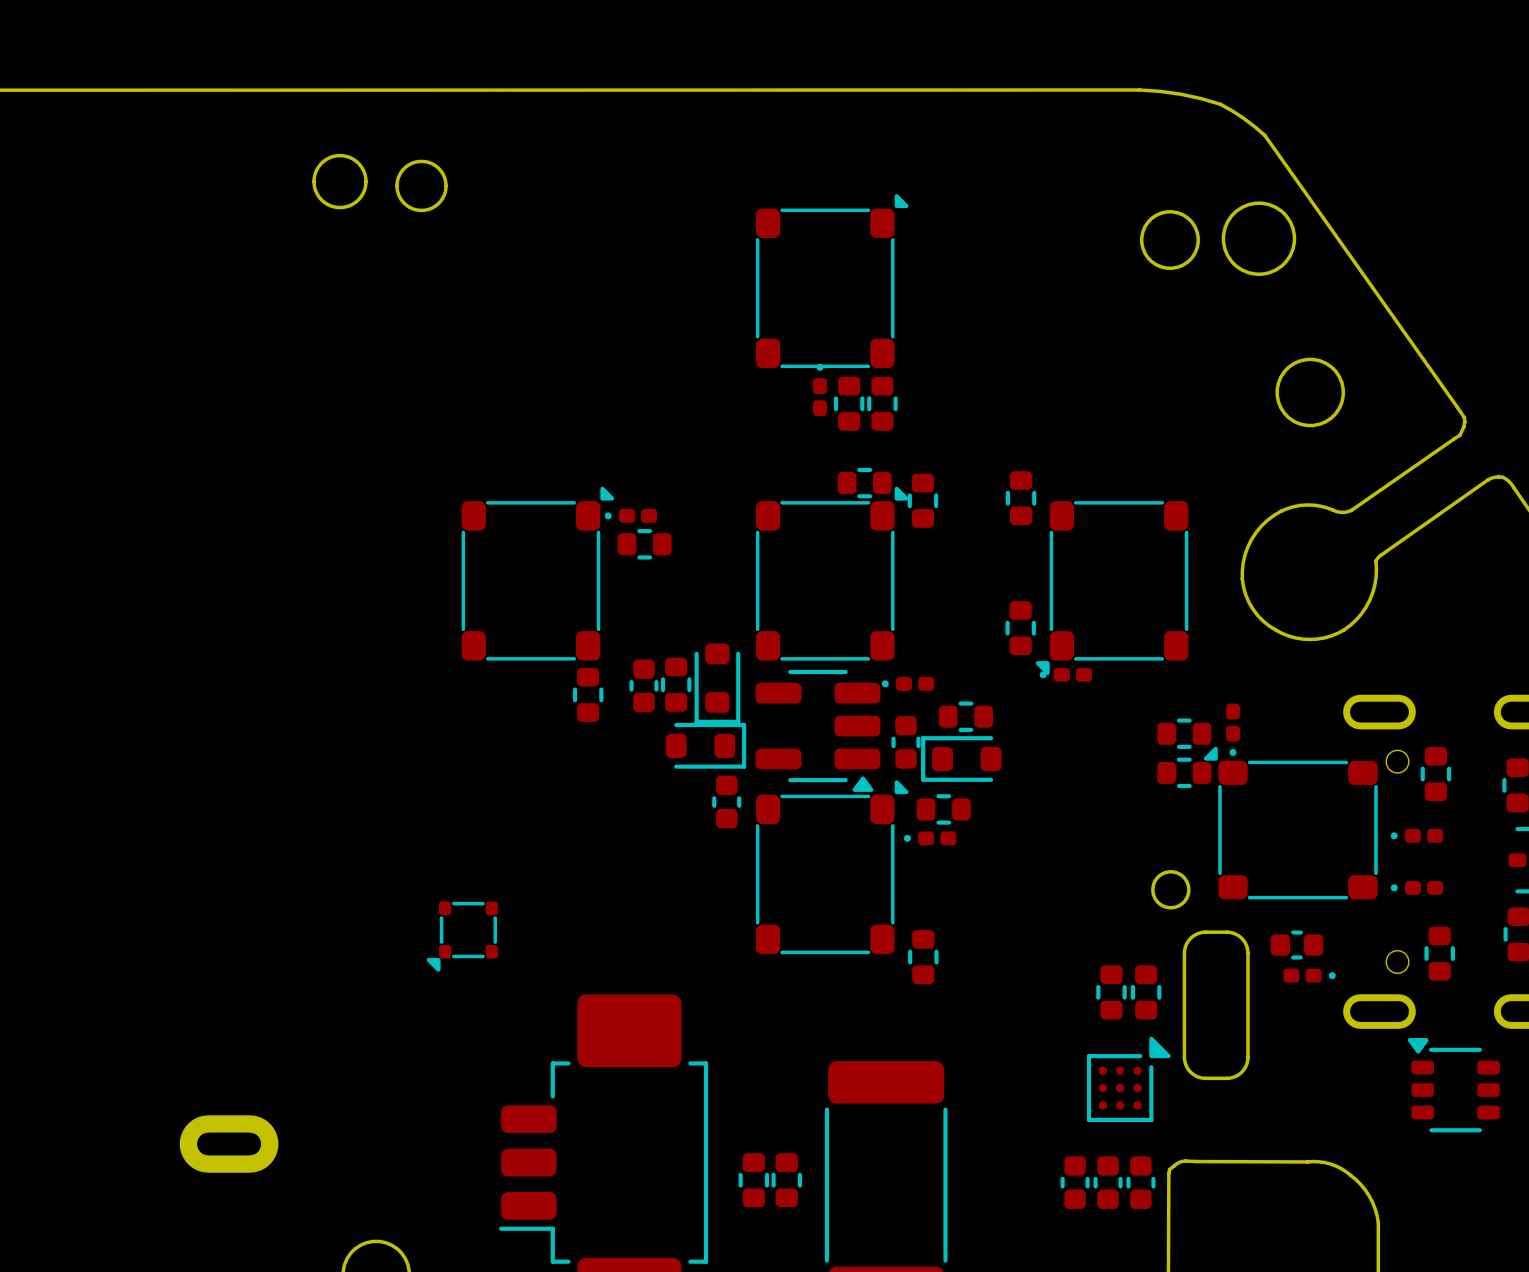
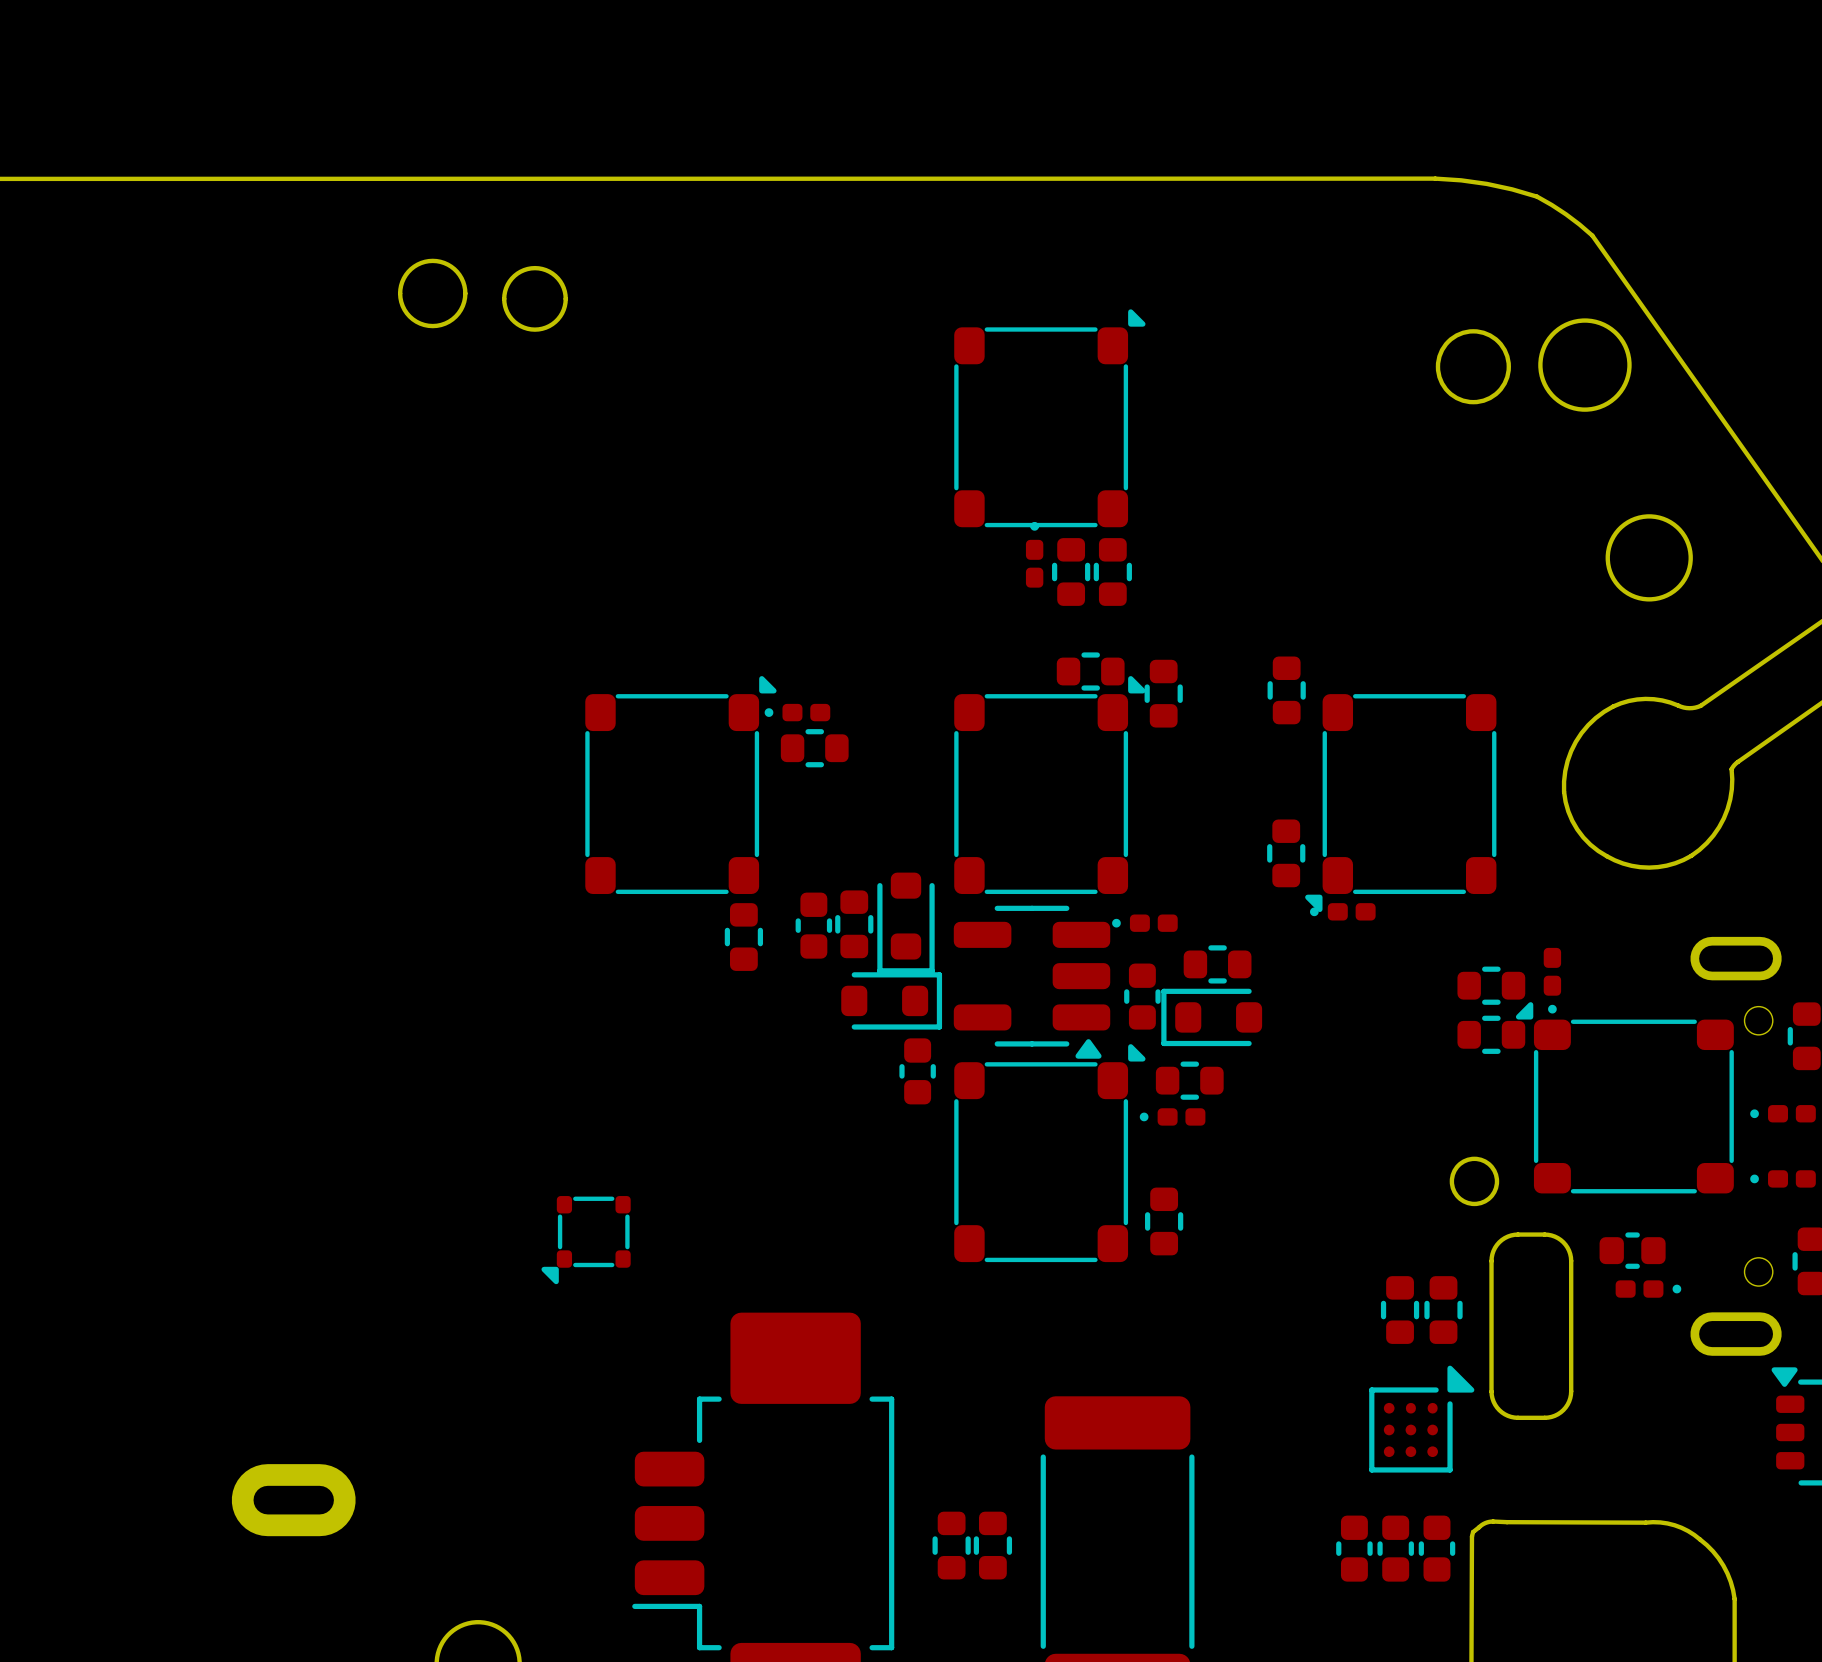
part position: (923, 957) -> (1164, 1221)

